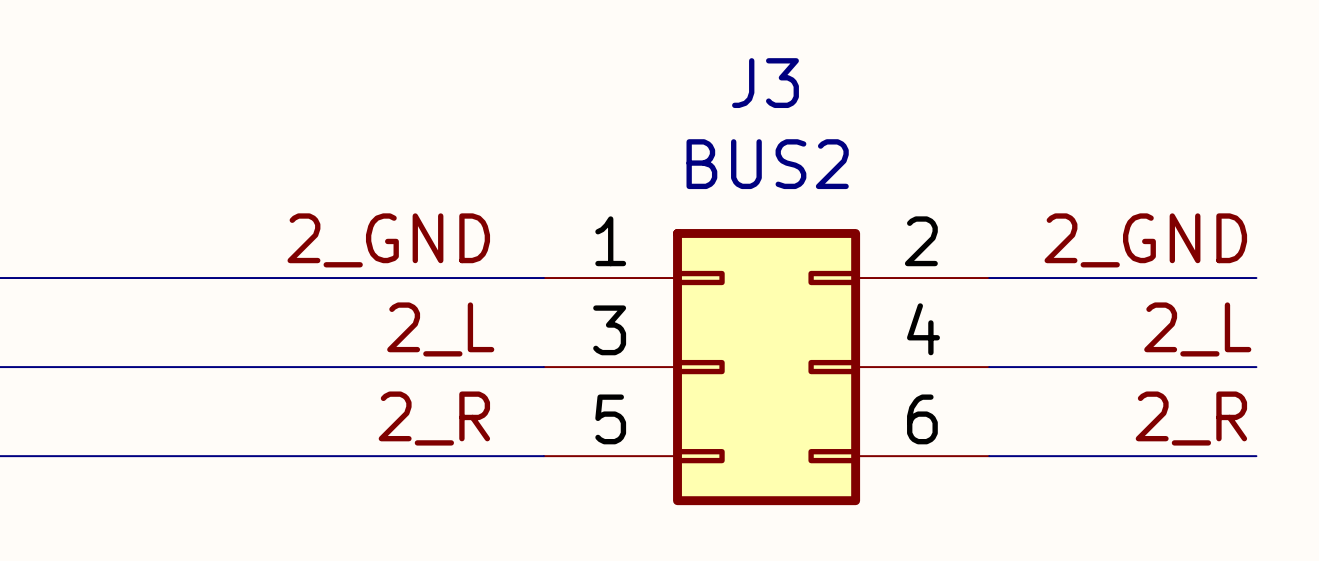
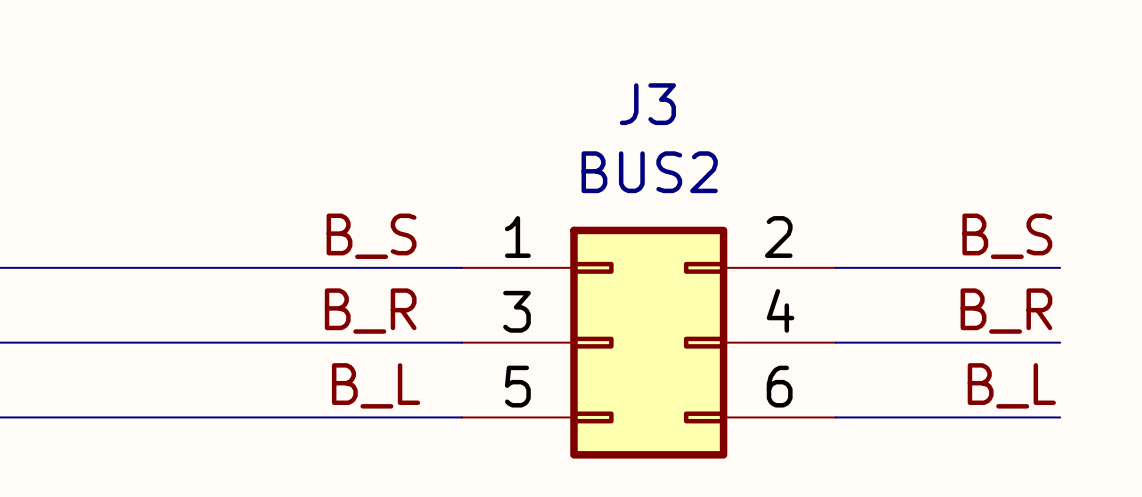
label: 2_GND (388, 240) -> B_S (371, 236)
label: 2_GND (1145, 240) -> B_S (1007, 236)
label: 2_L (440, 329) -> B_R (370, 311)
label: 2_L (1197, 329) -> B_R (1006, 311)
label: 2_R (434, 418) -> B_L (376, 385)
label: 2_R (1191, 418) -> B_L (1011, 385)

